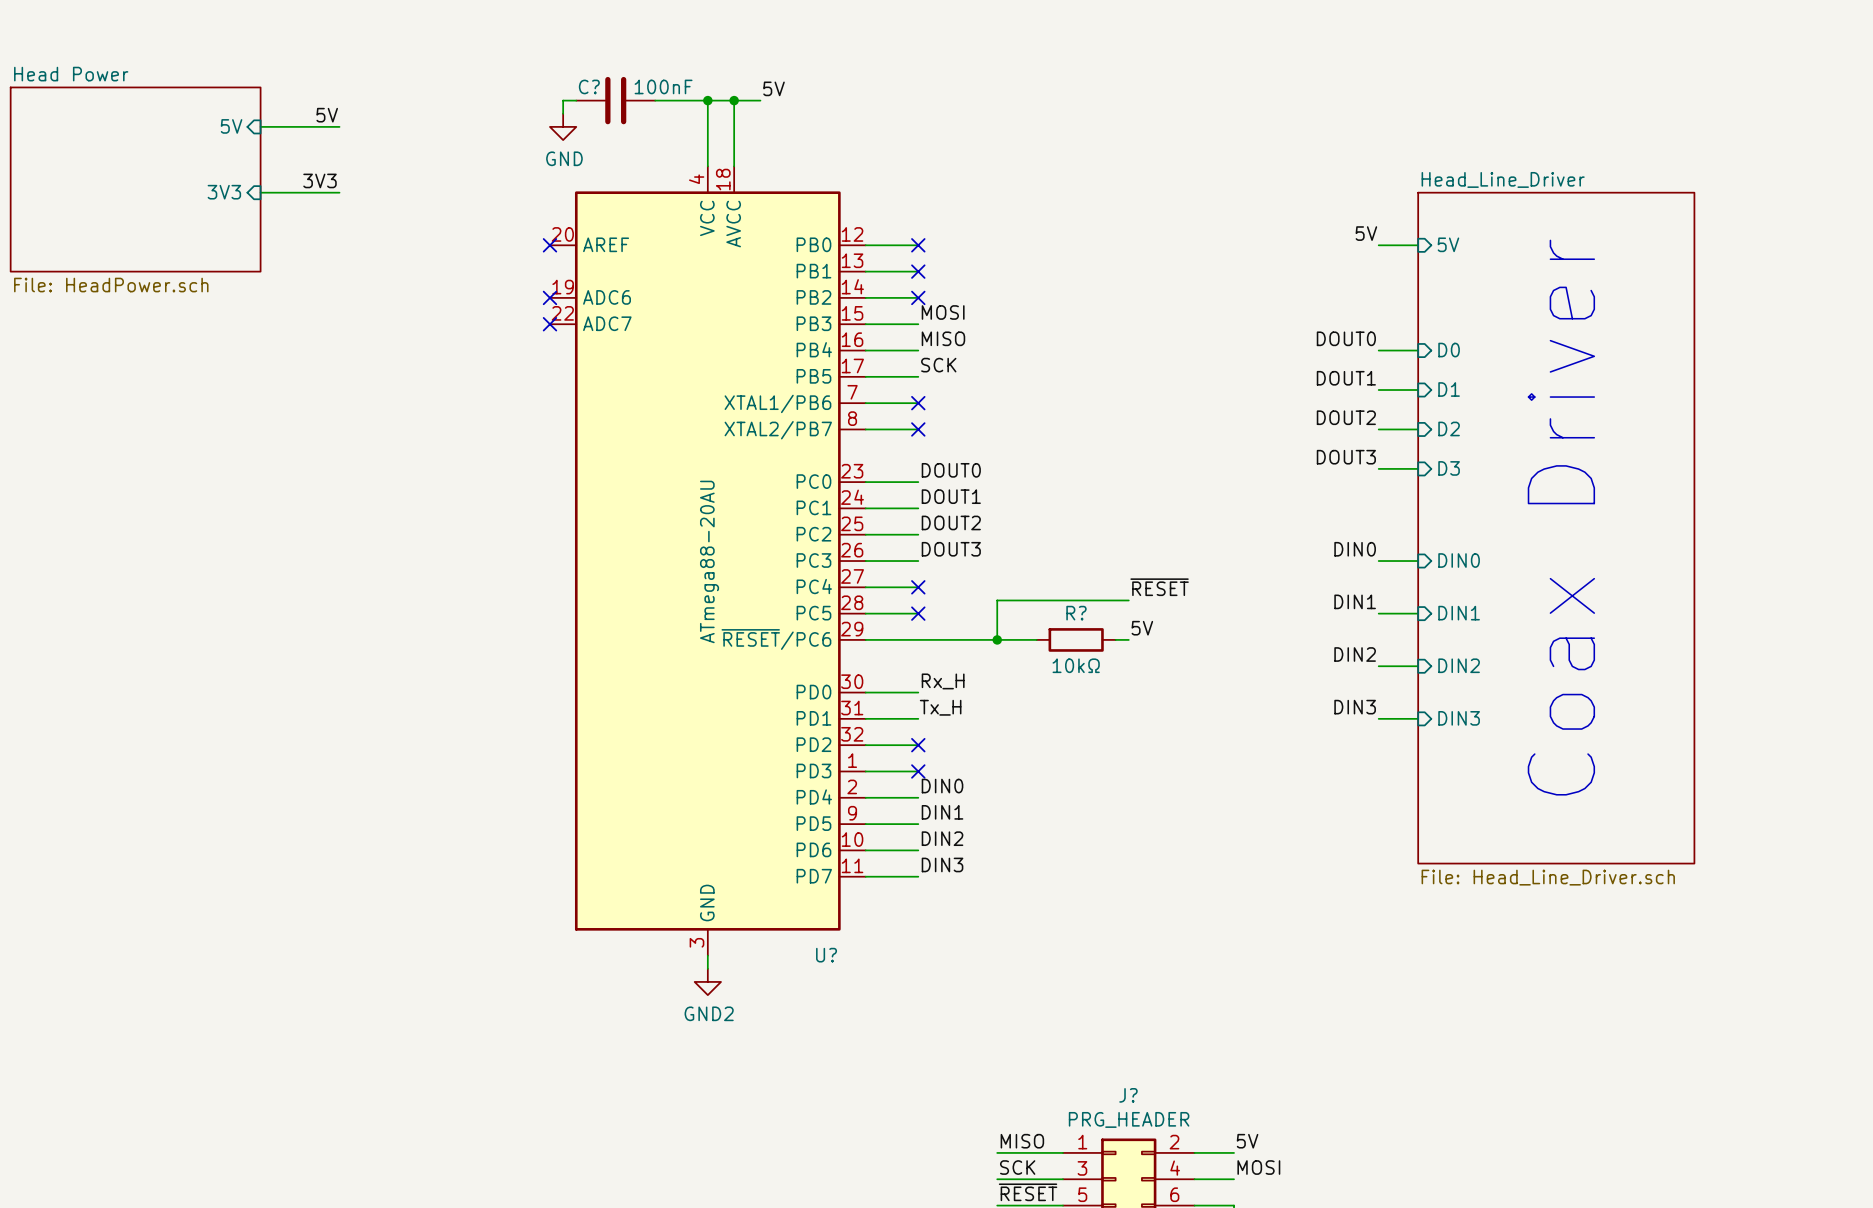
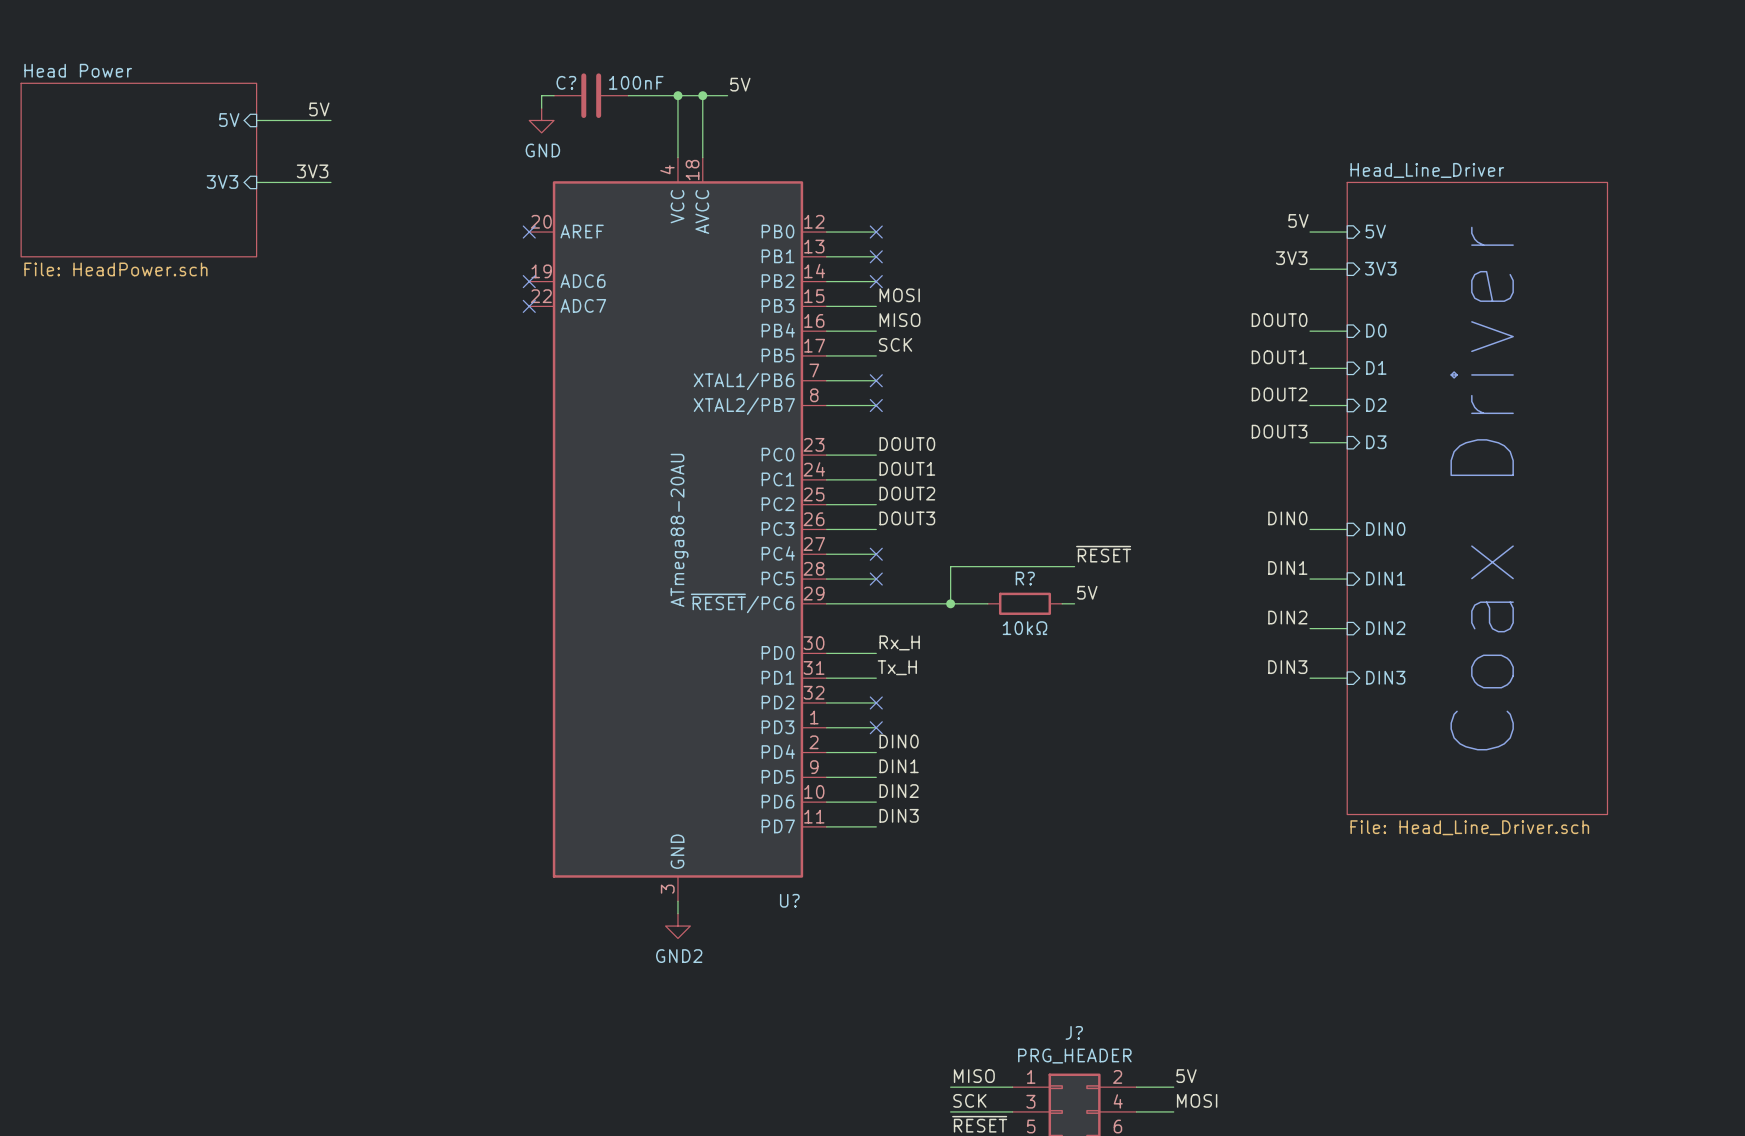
label: none -> 3V3 (1291, 258)
wire: none -> (1310, 269) (1347, 269)
sheet pin: none -> 3V3 (1380, 268)

